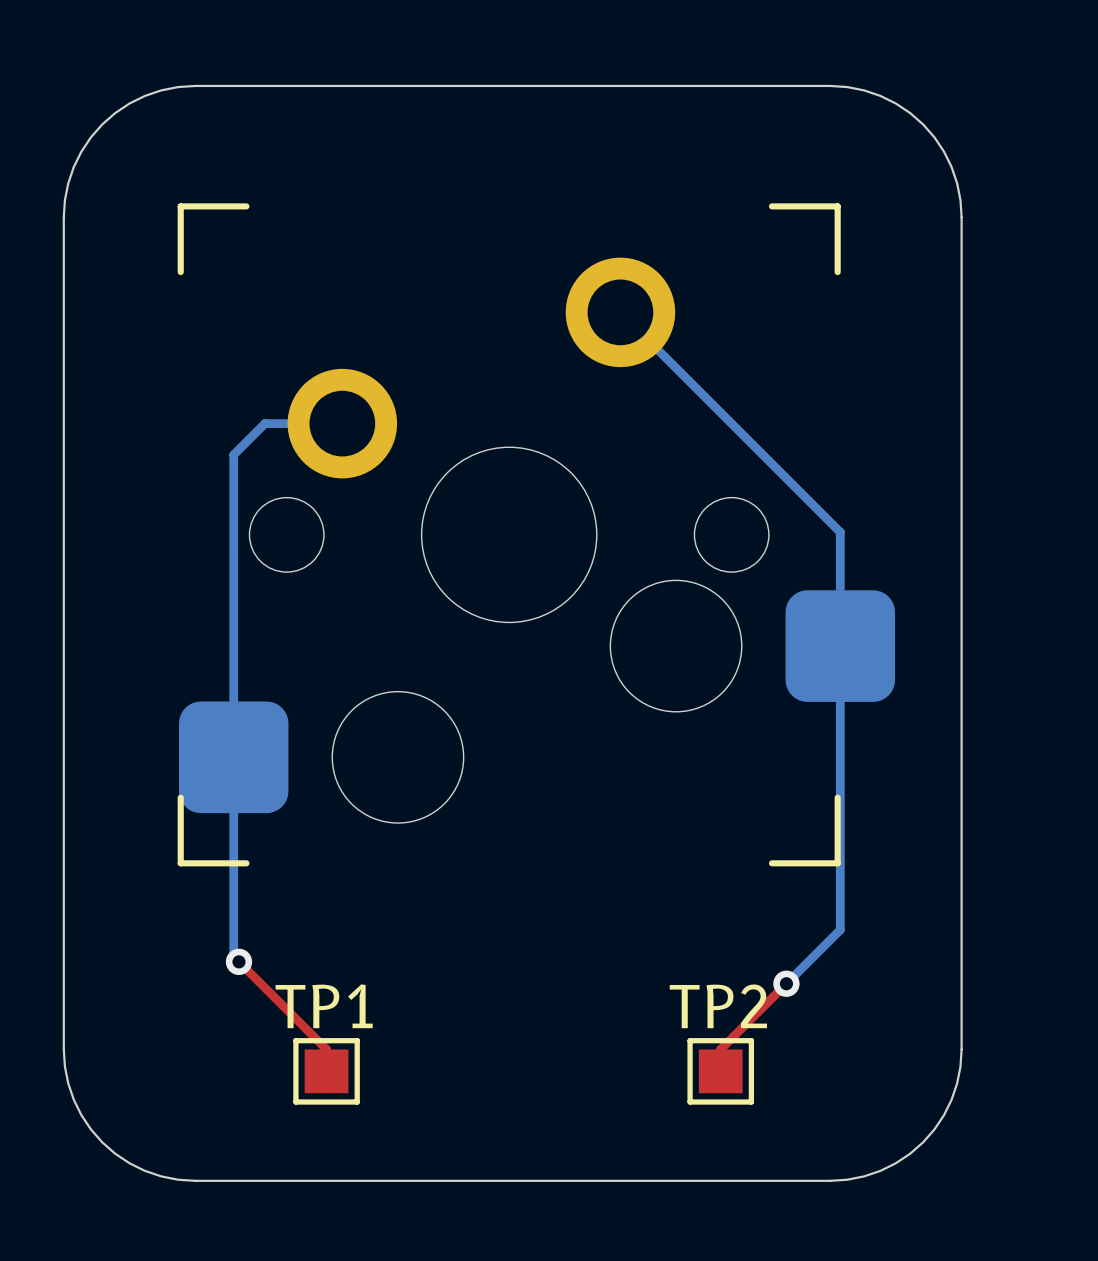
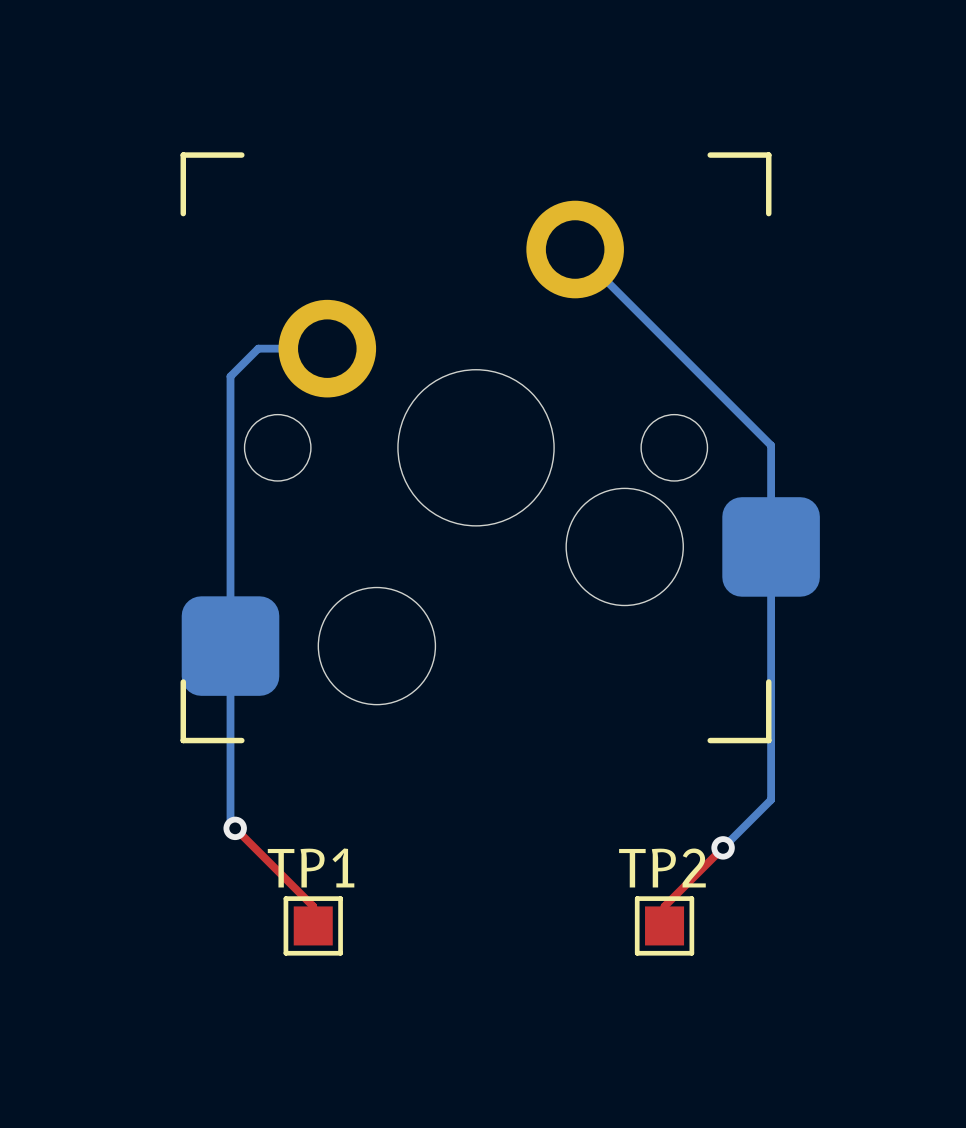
board edge: (195, 85) (847, 87) (880, 95) (910, 113) (934, 137) (944, 151) (957, 183) (961, 217) (961, 1049) (957, 1083) (944, 1115) (923, 1142) (895, 1163) (864, 1176) (830, 1180) (195, 1180) (161, 1176) (129, 1163) (102, 1142) (81, 1115) (68, 1083) (63, 1049) (64, 200) (68, 183) (81, 151) (90, 137) (115, 113) (129, 103) (161, 90) (195, 85) -> none

